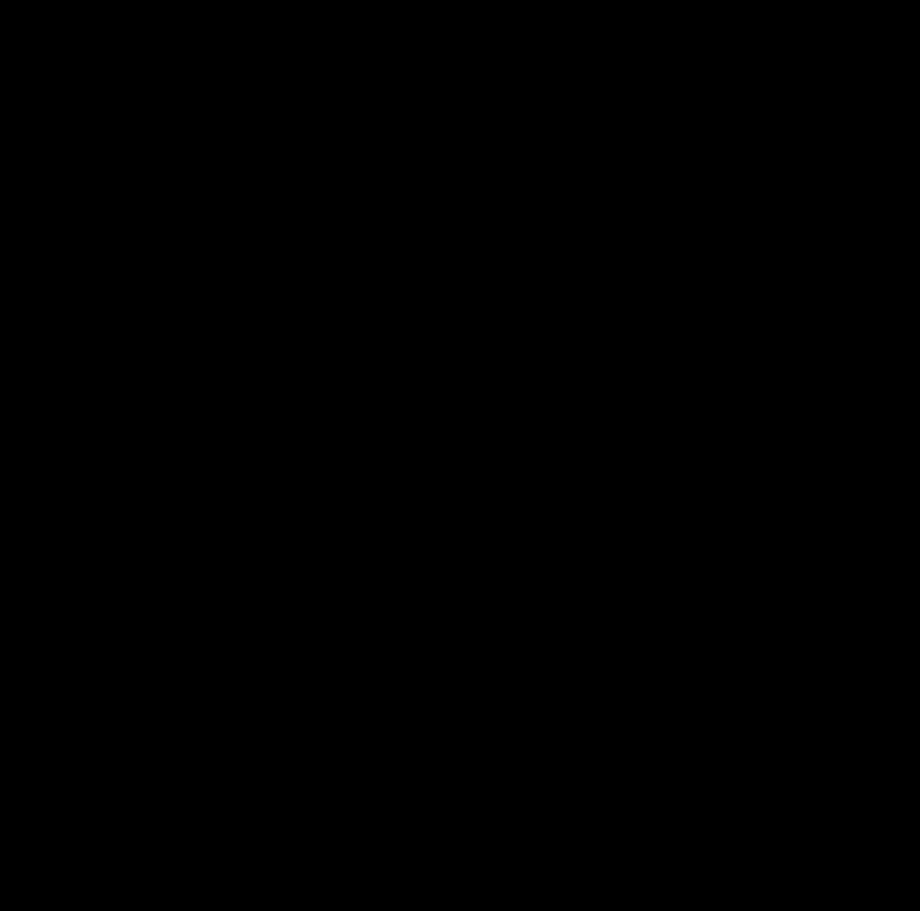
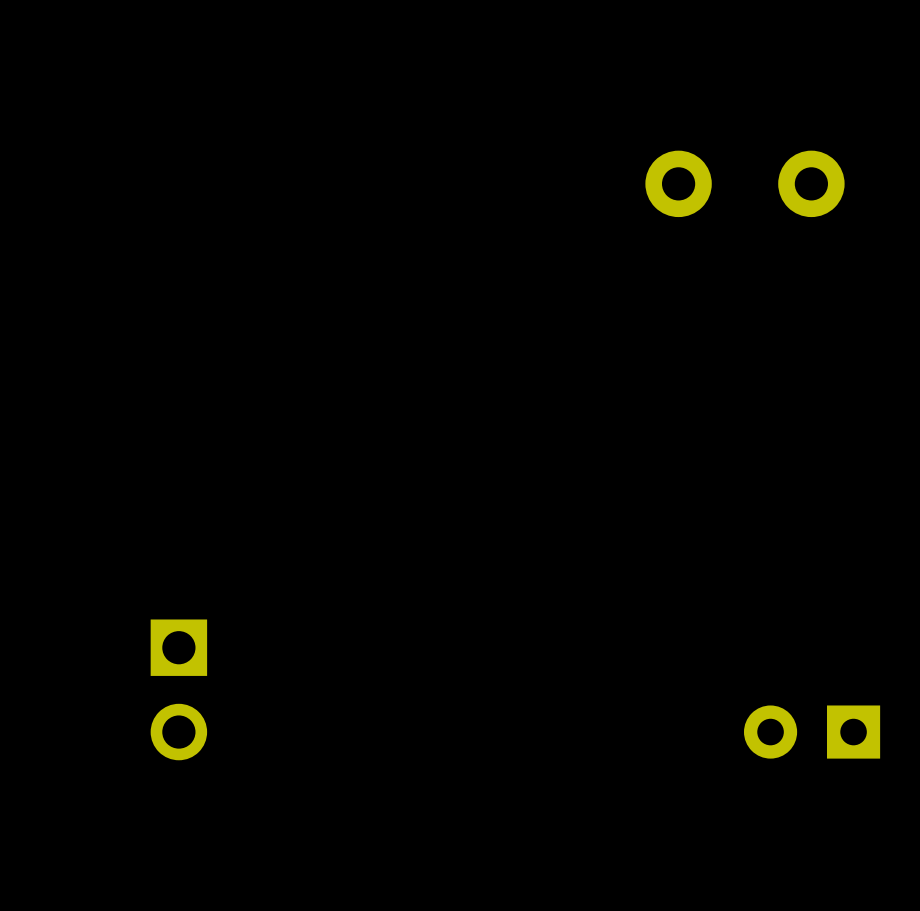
part: none -> (744, 183)
part: none -> (178, 689)
part: none -> (812, 732)

